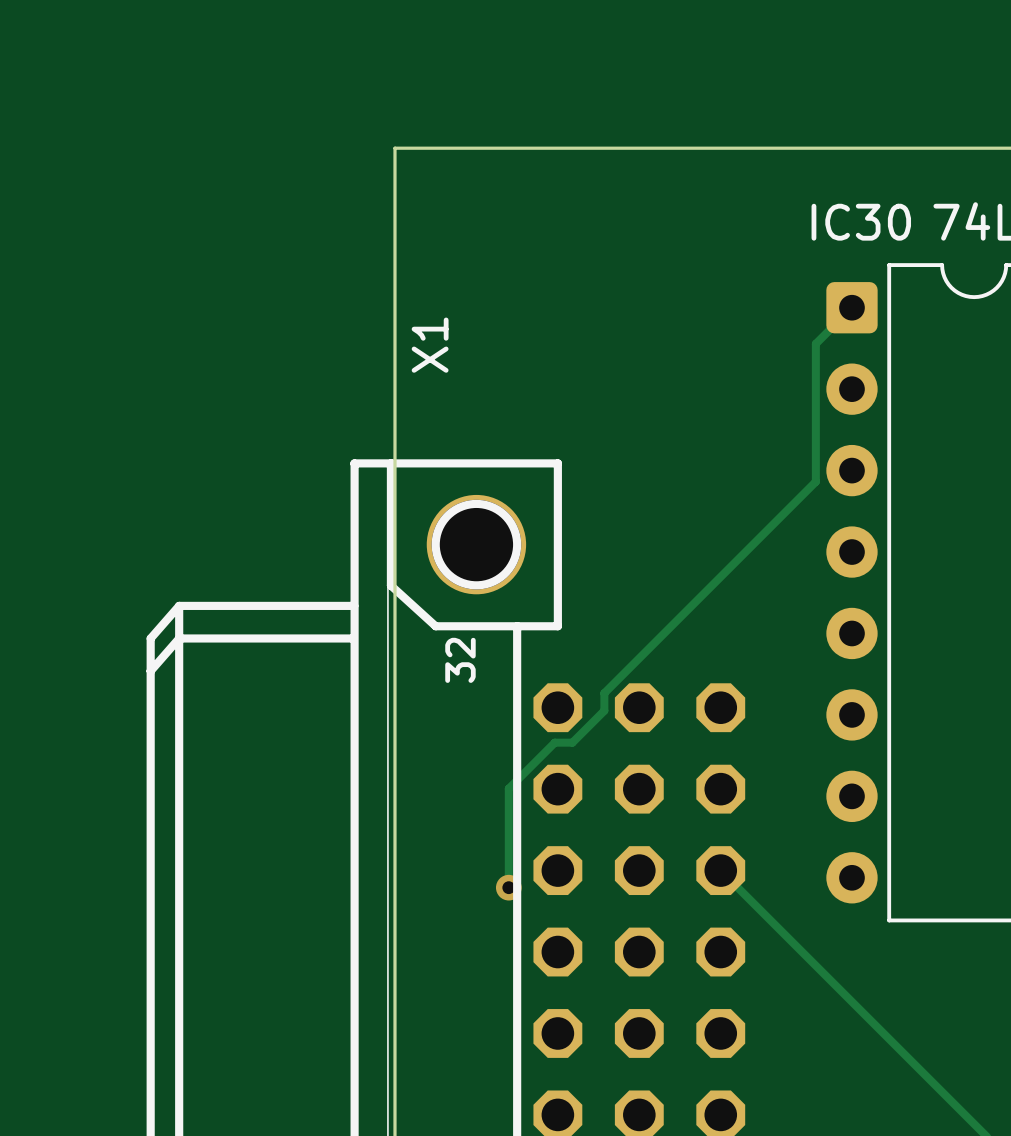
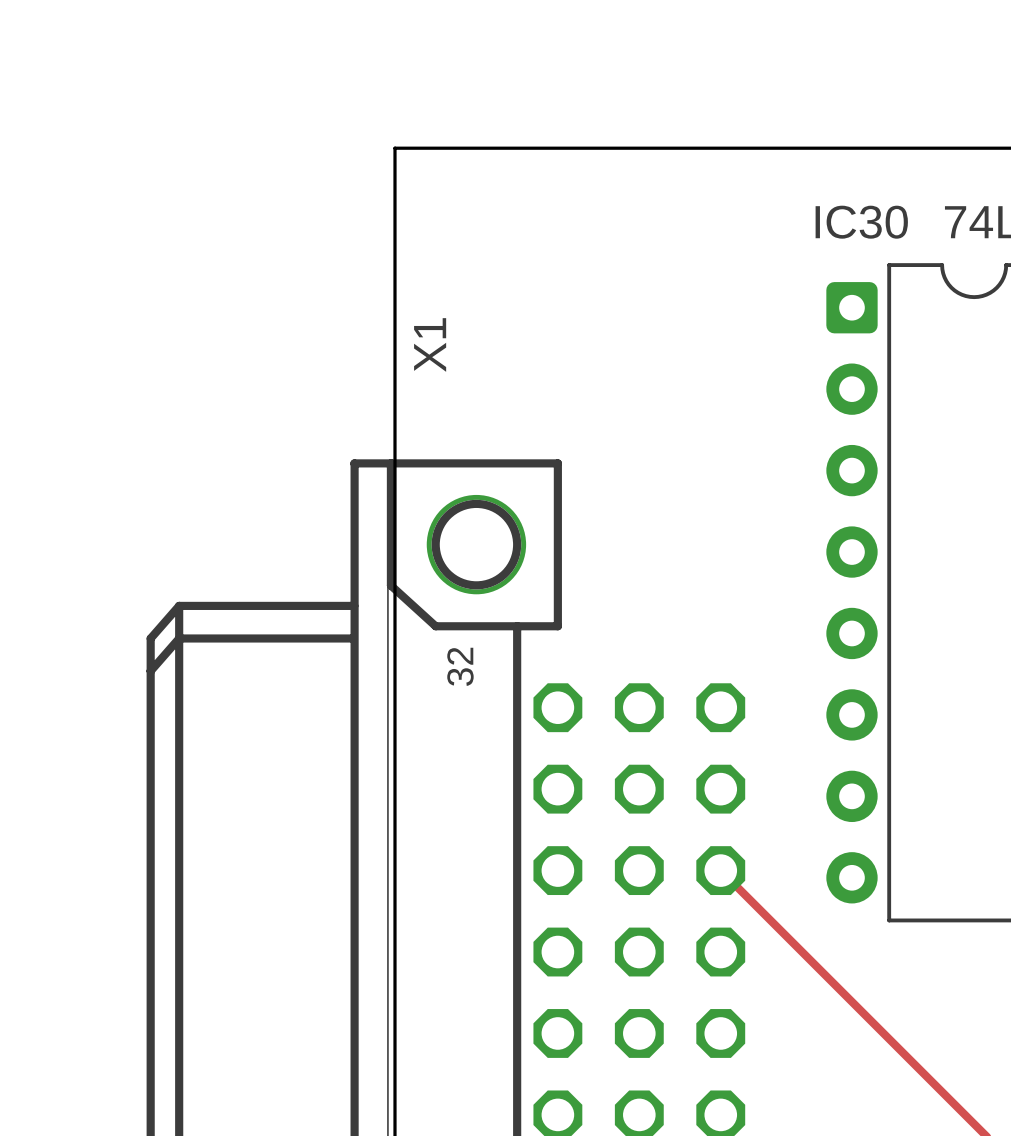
track: (851, 307) (815, 343) (815, 481) (604, 693) (604, 710) (572, 742) (554, 742) (508, 788) (508, 887) -> none
via: (508, 887) -> none

